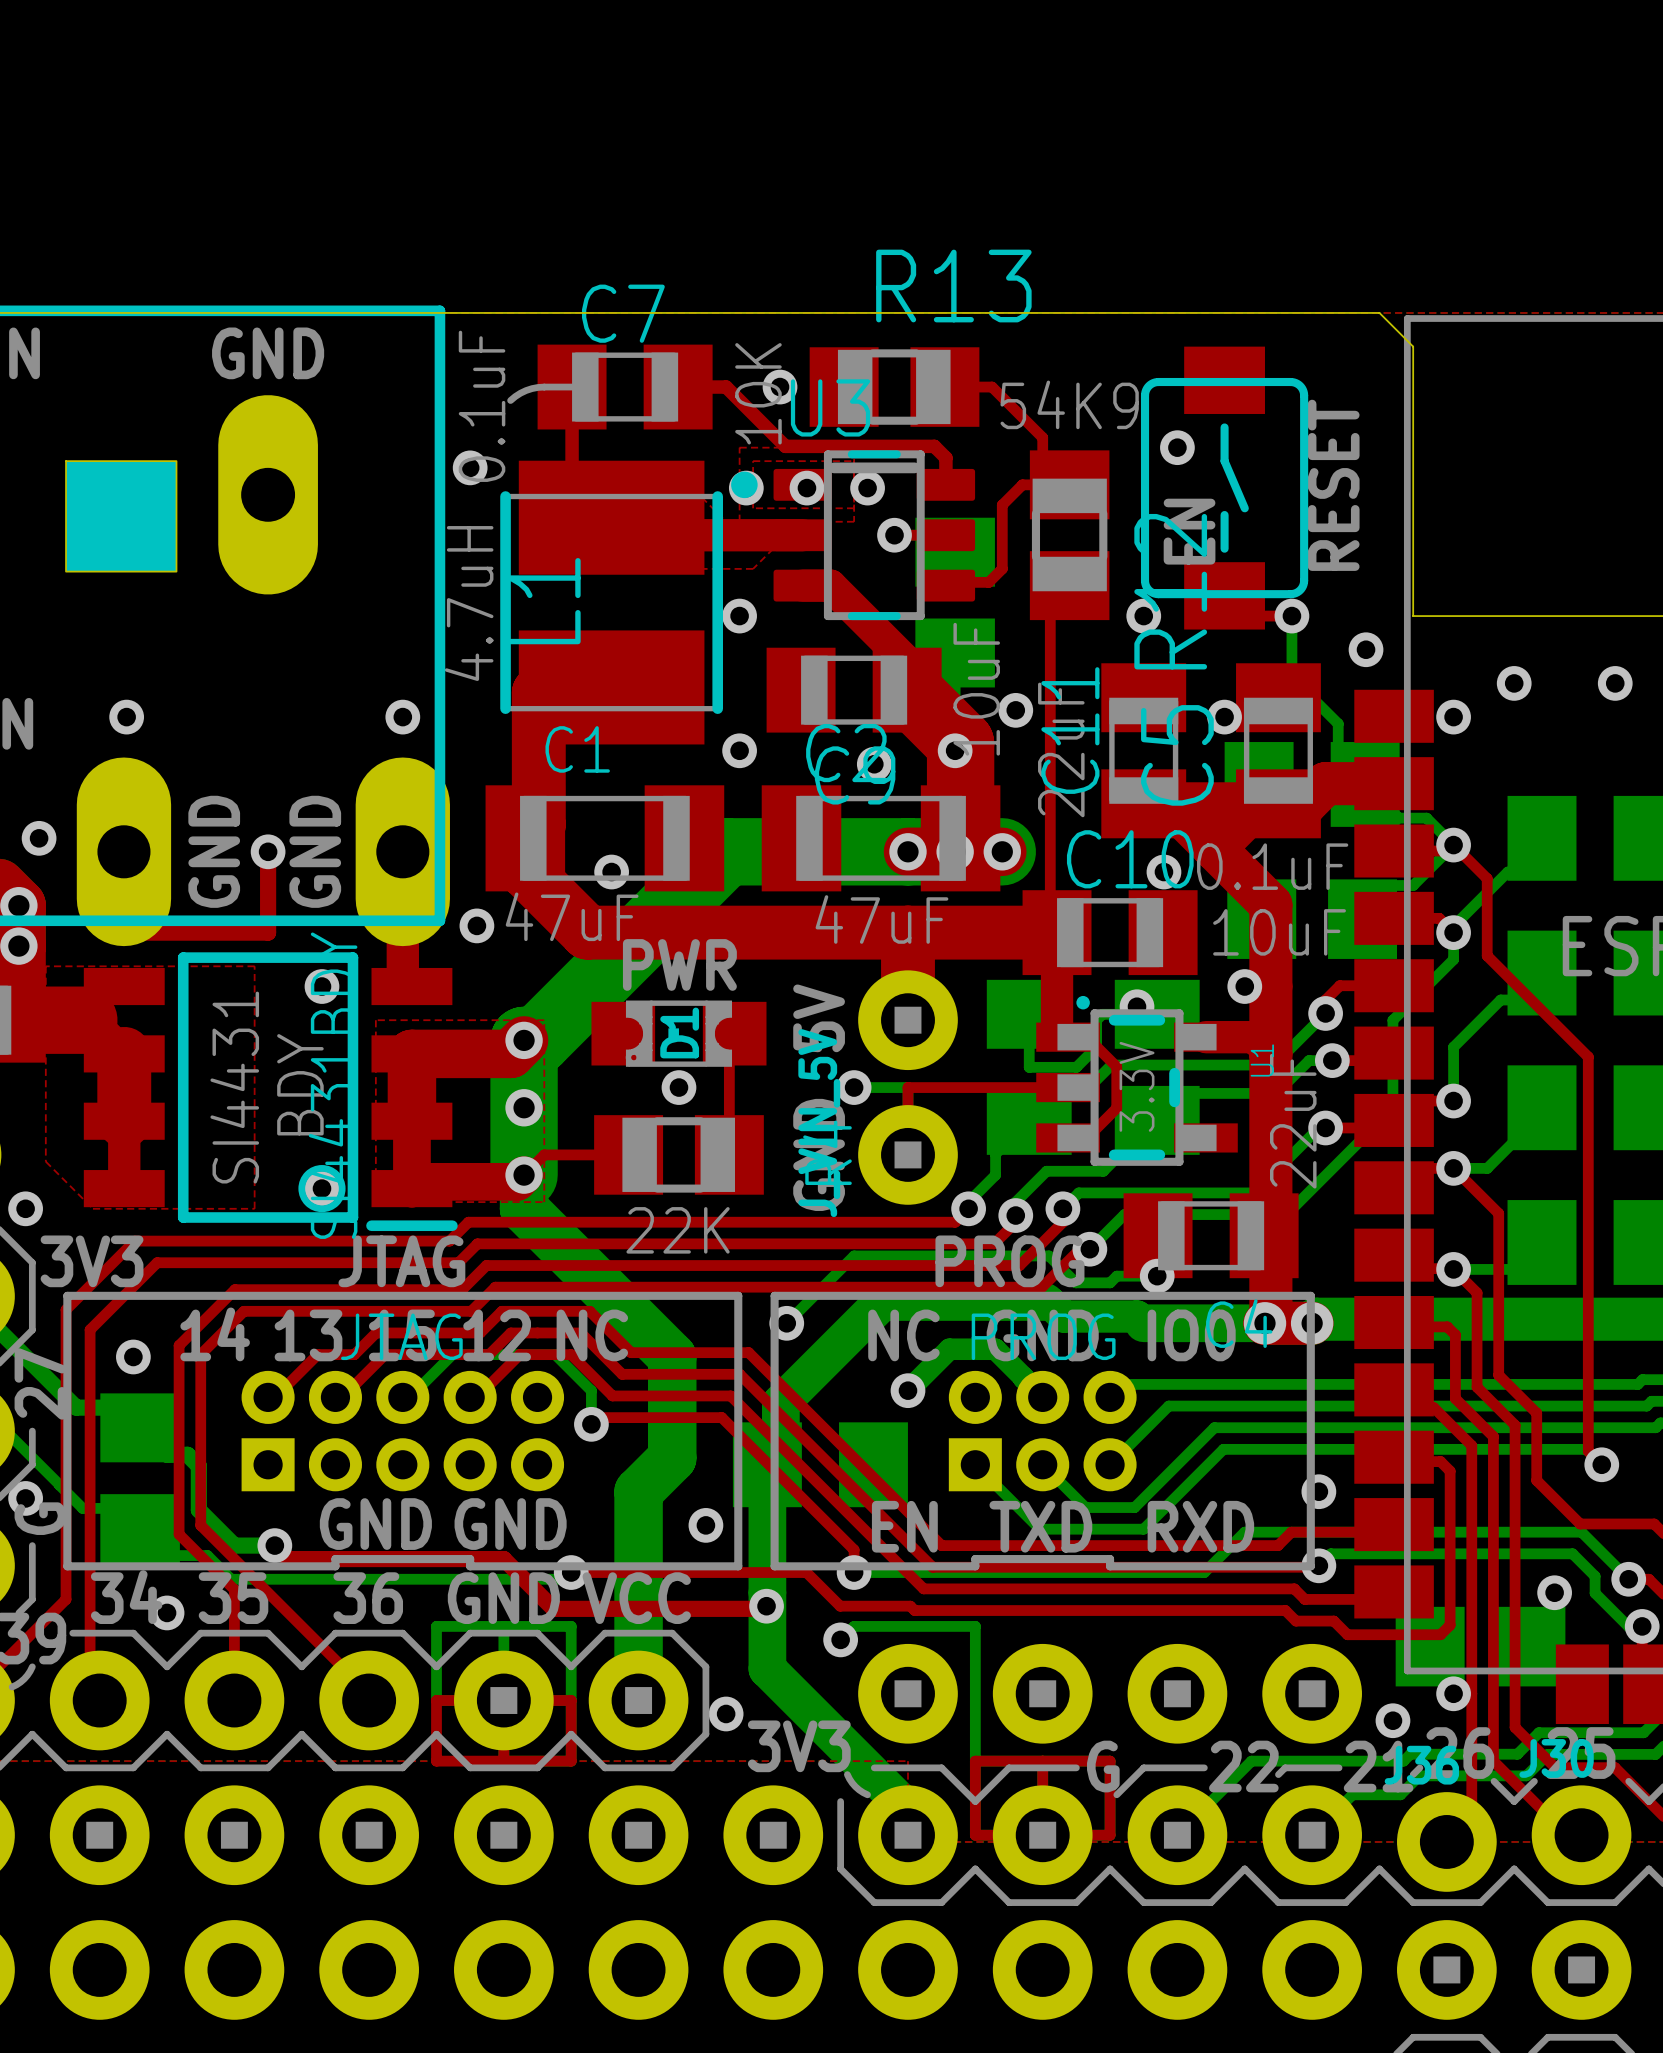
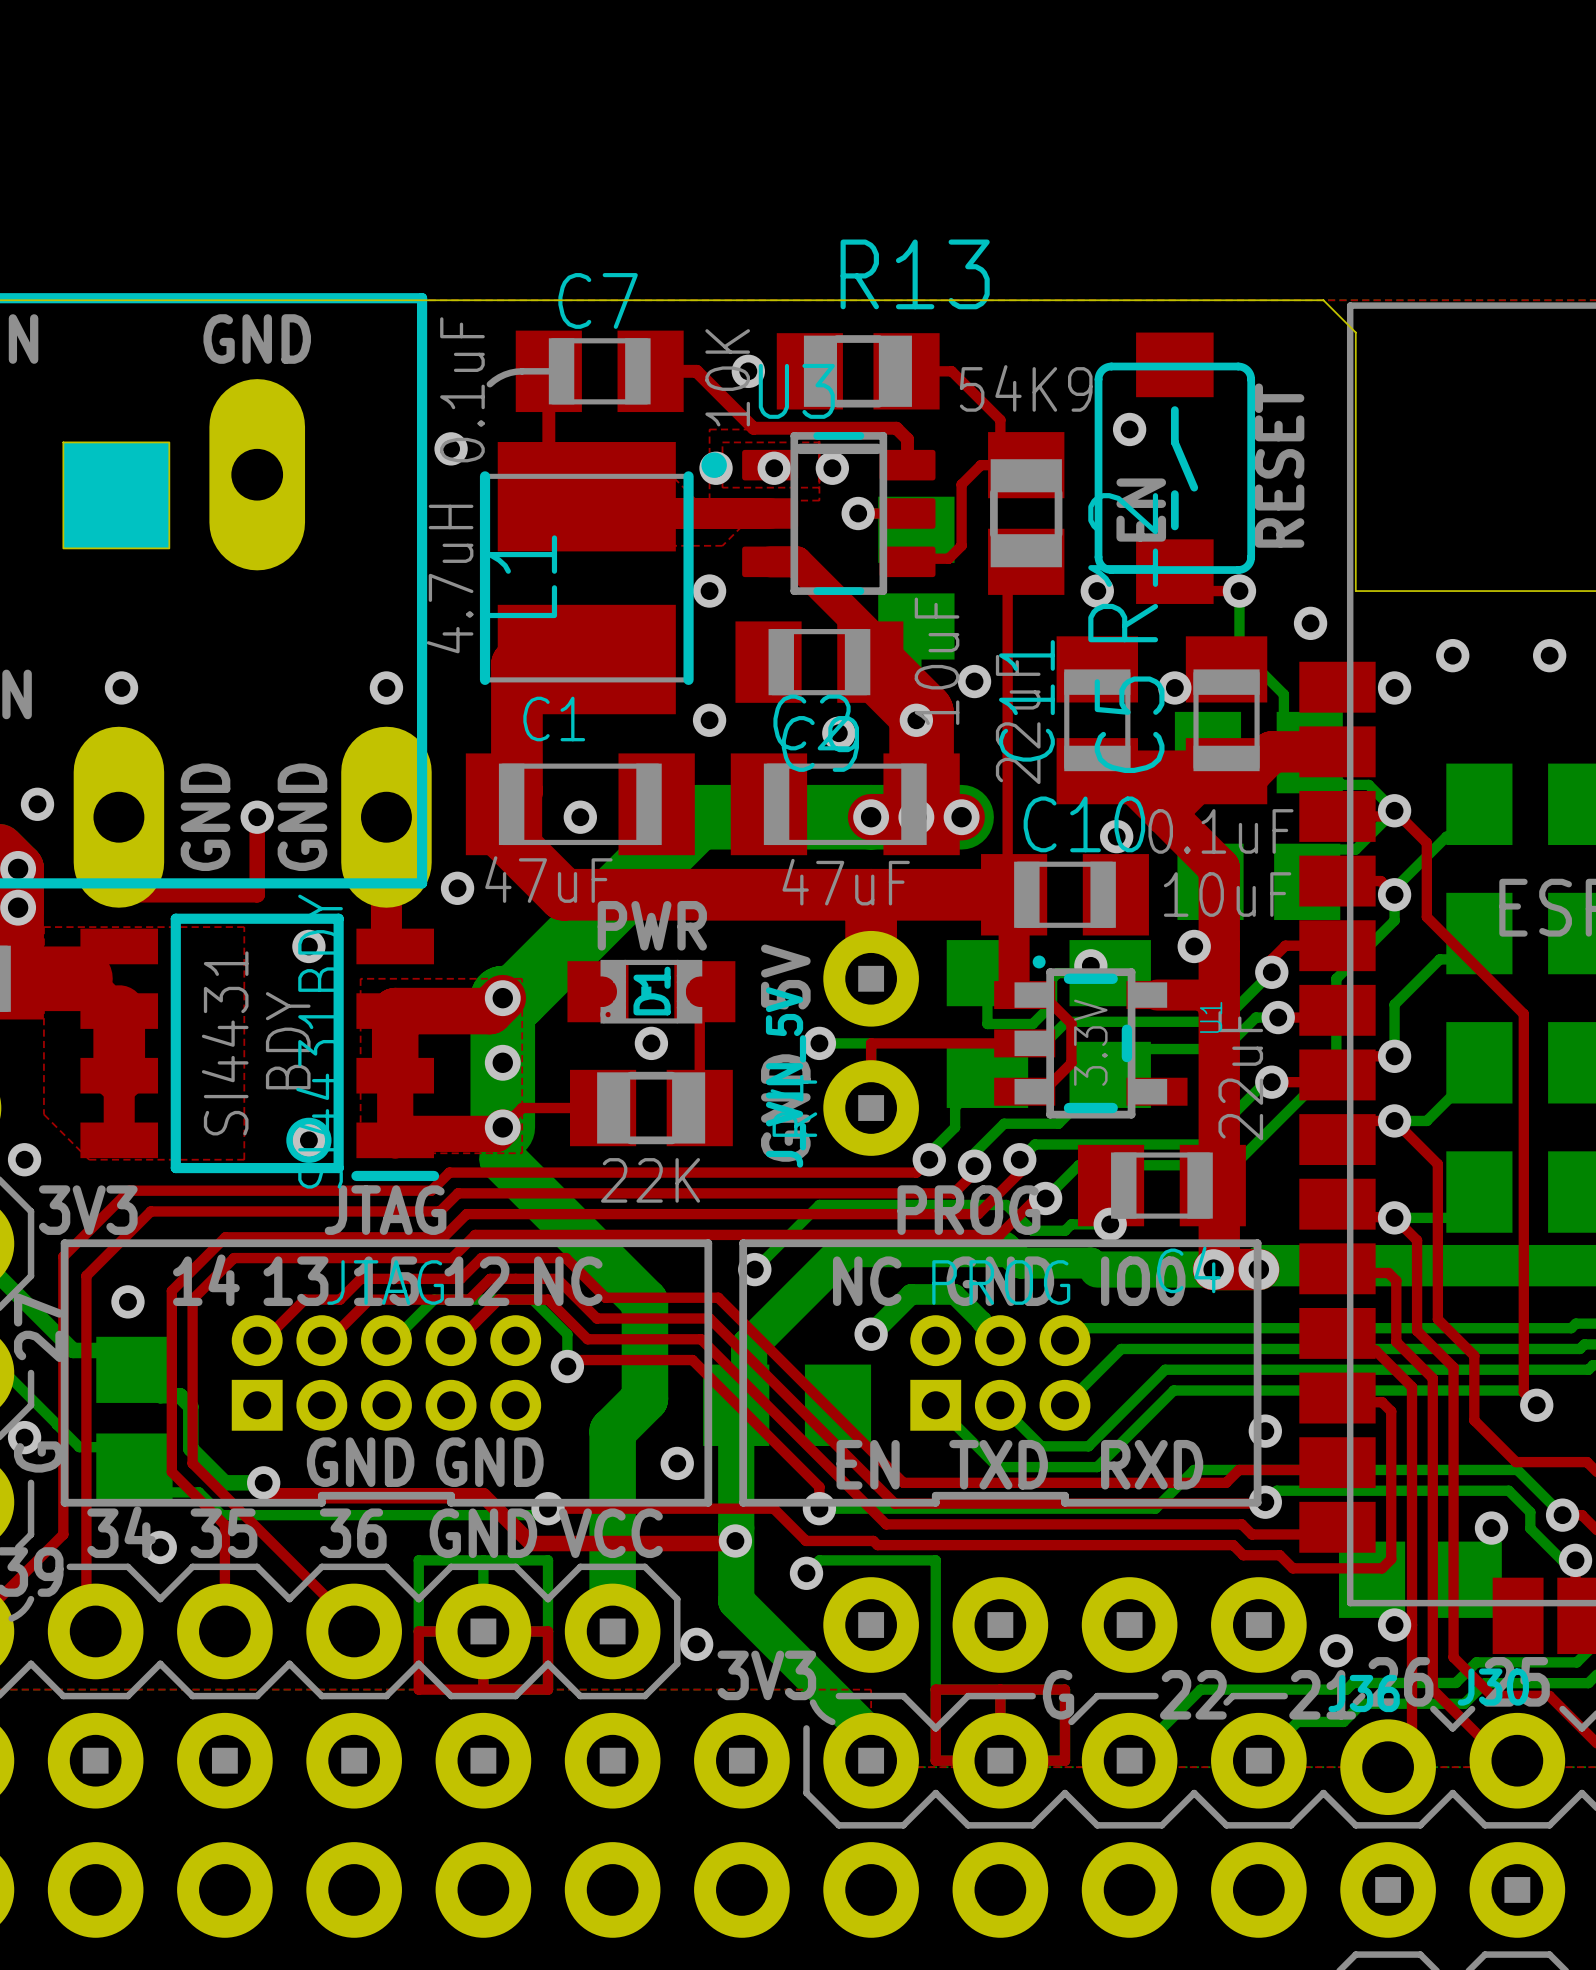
via position: (611, 872) -> (580, 817)

